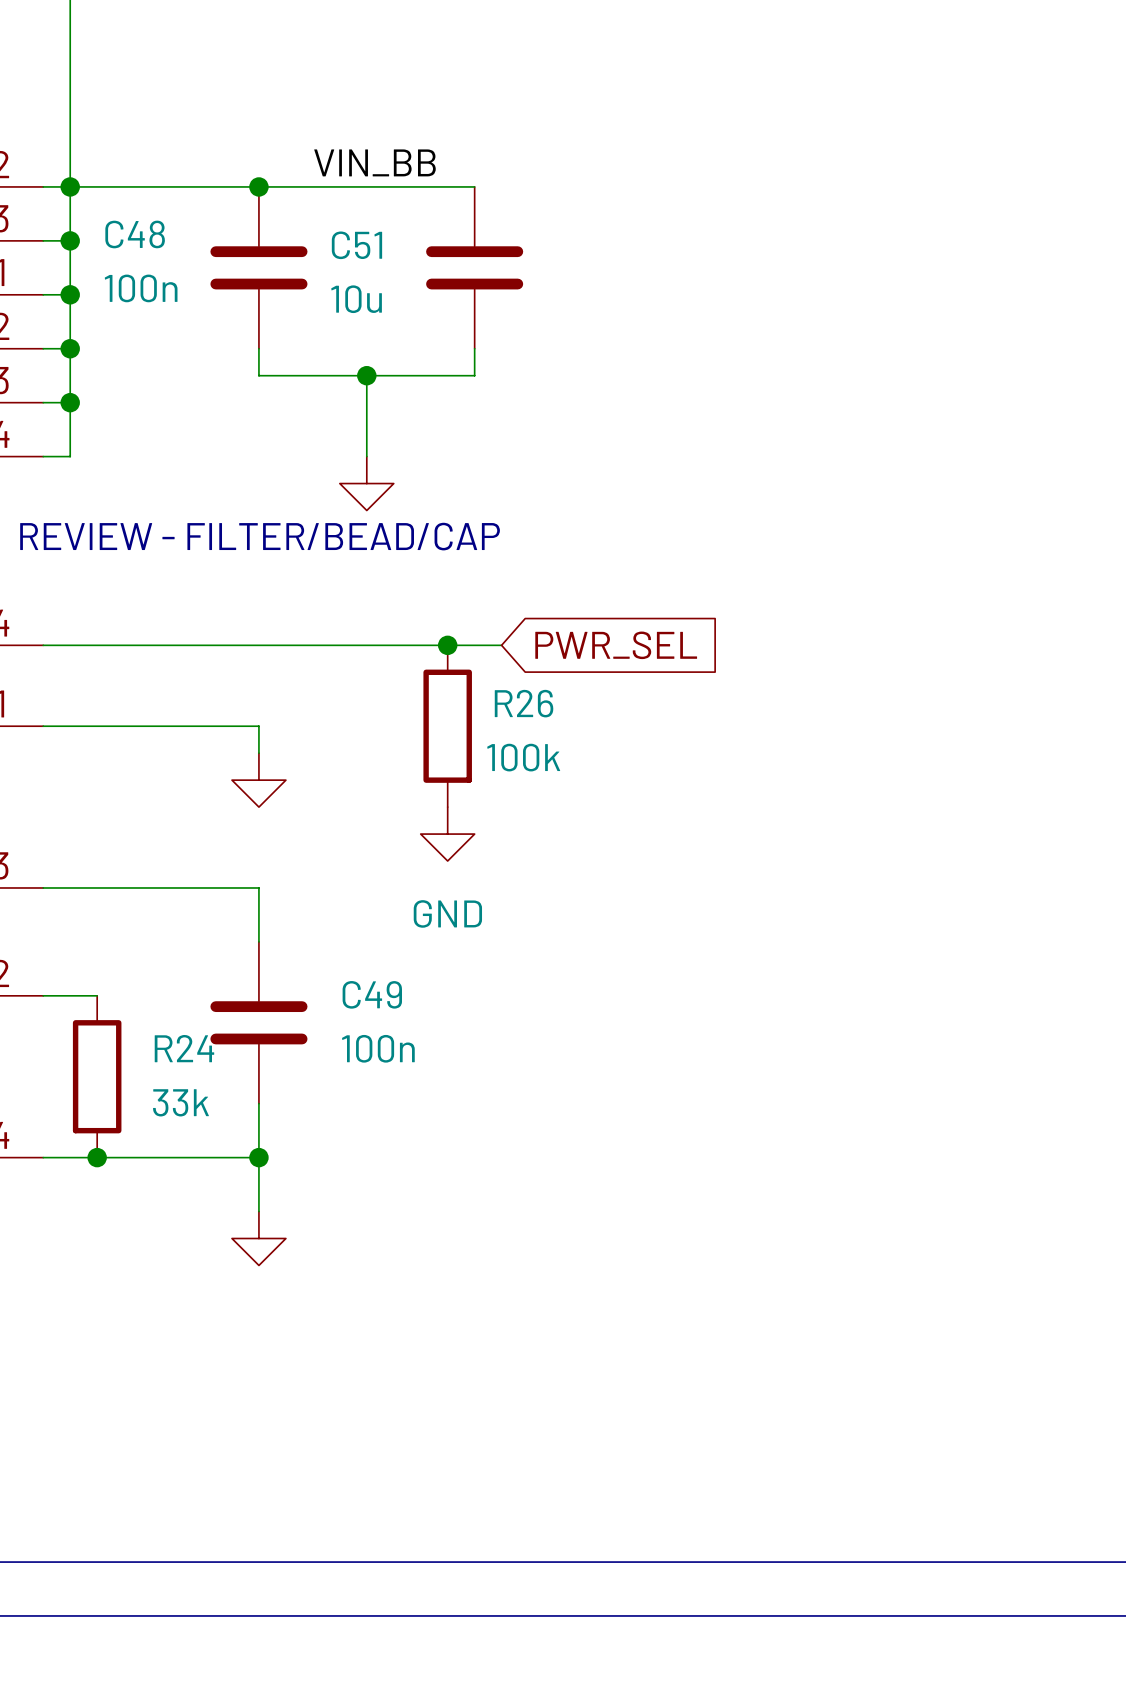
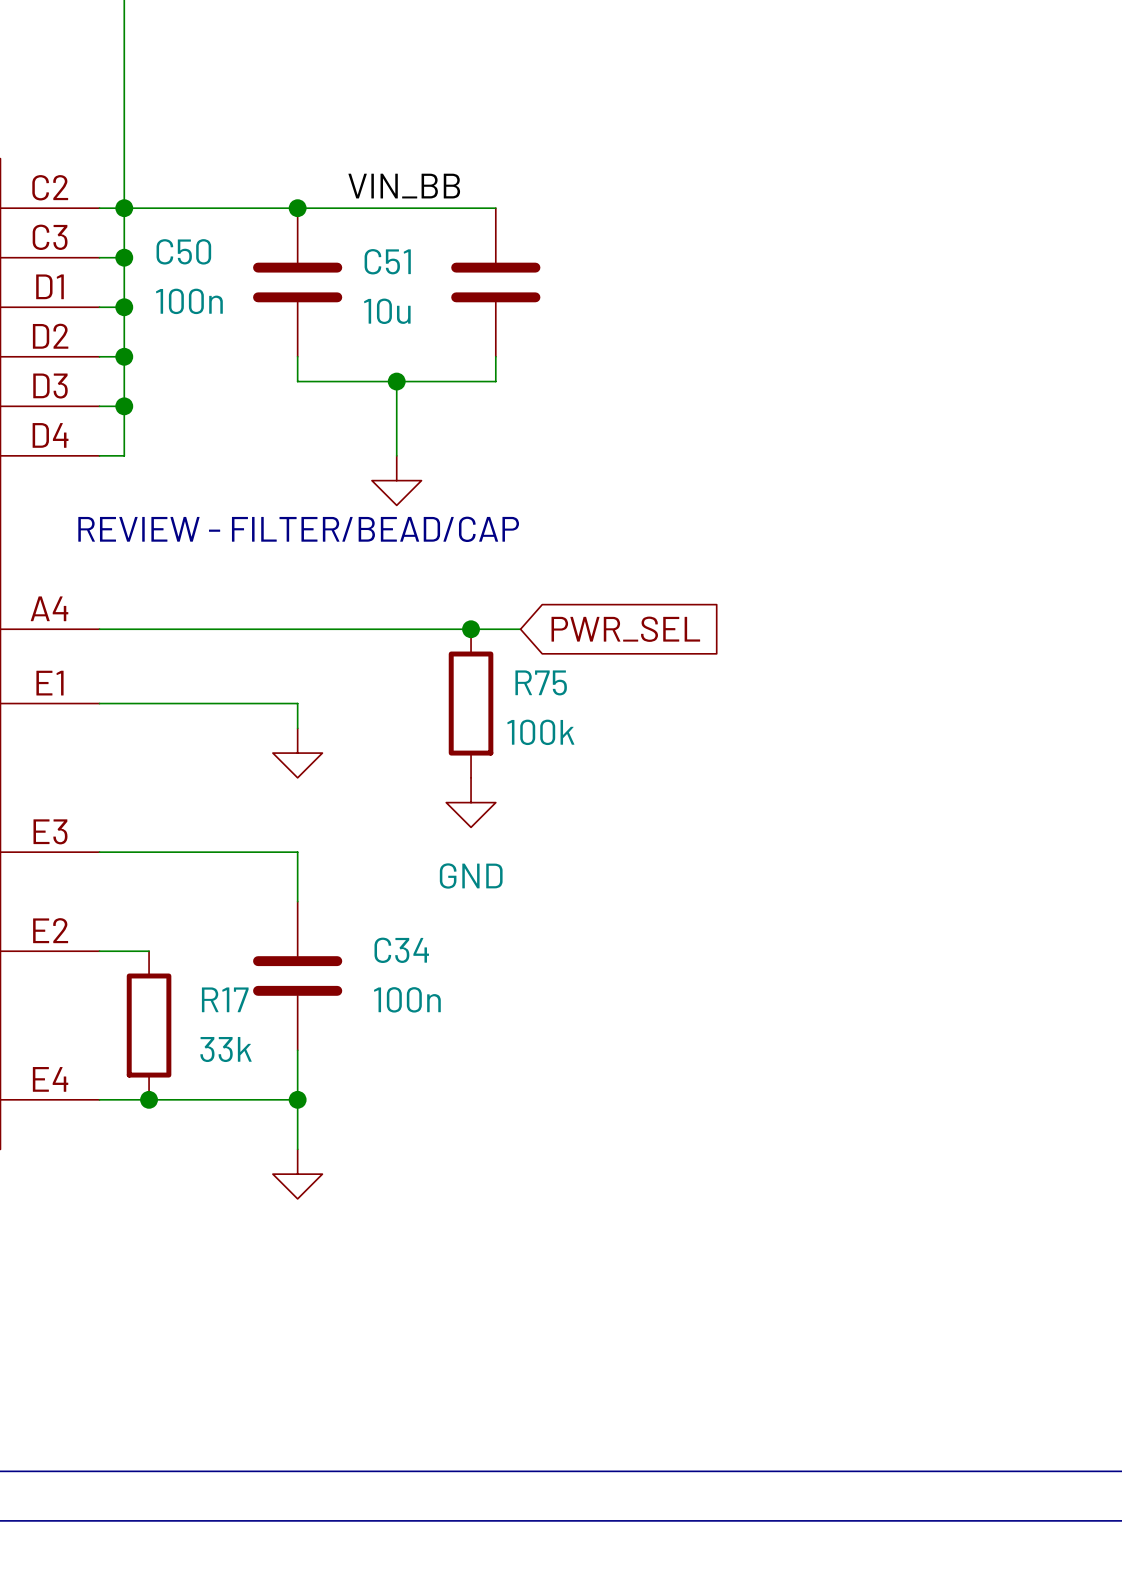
C48 name: C48 (135, 234) -> C50 (183, 251)
R26 name: R26 (524, 703) -> R75 (541, 682)
C49 name: C49 (372, 994) -> C34 (401, 950)
R24 name: R24 (184, 1048) -> R17 (225, 999)

